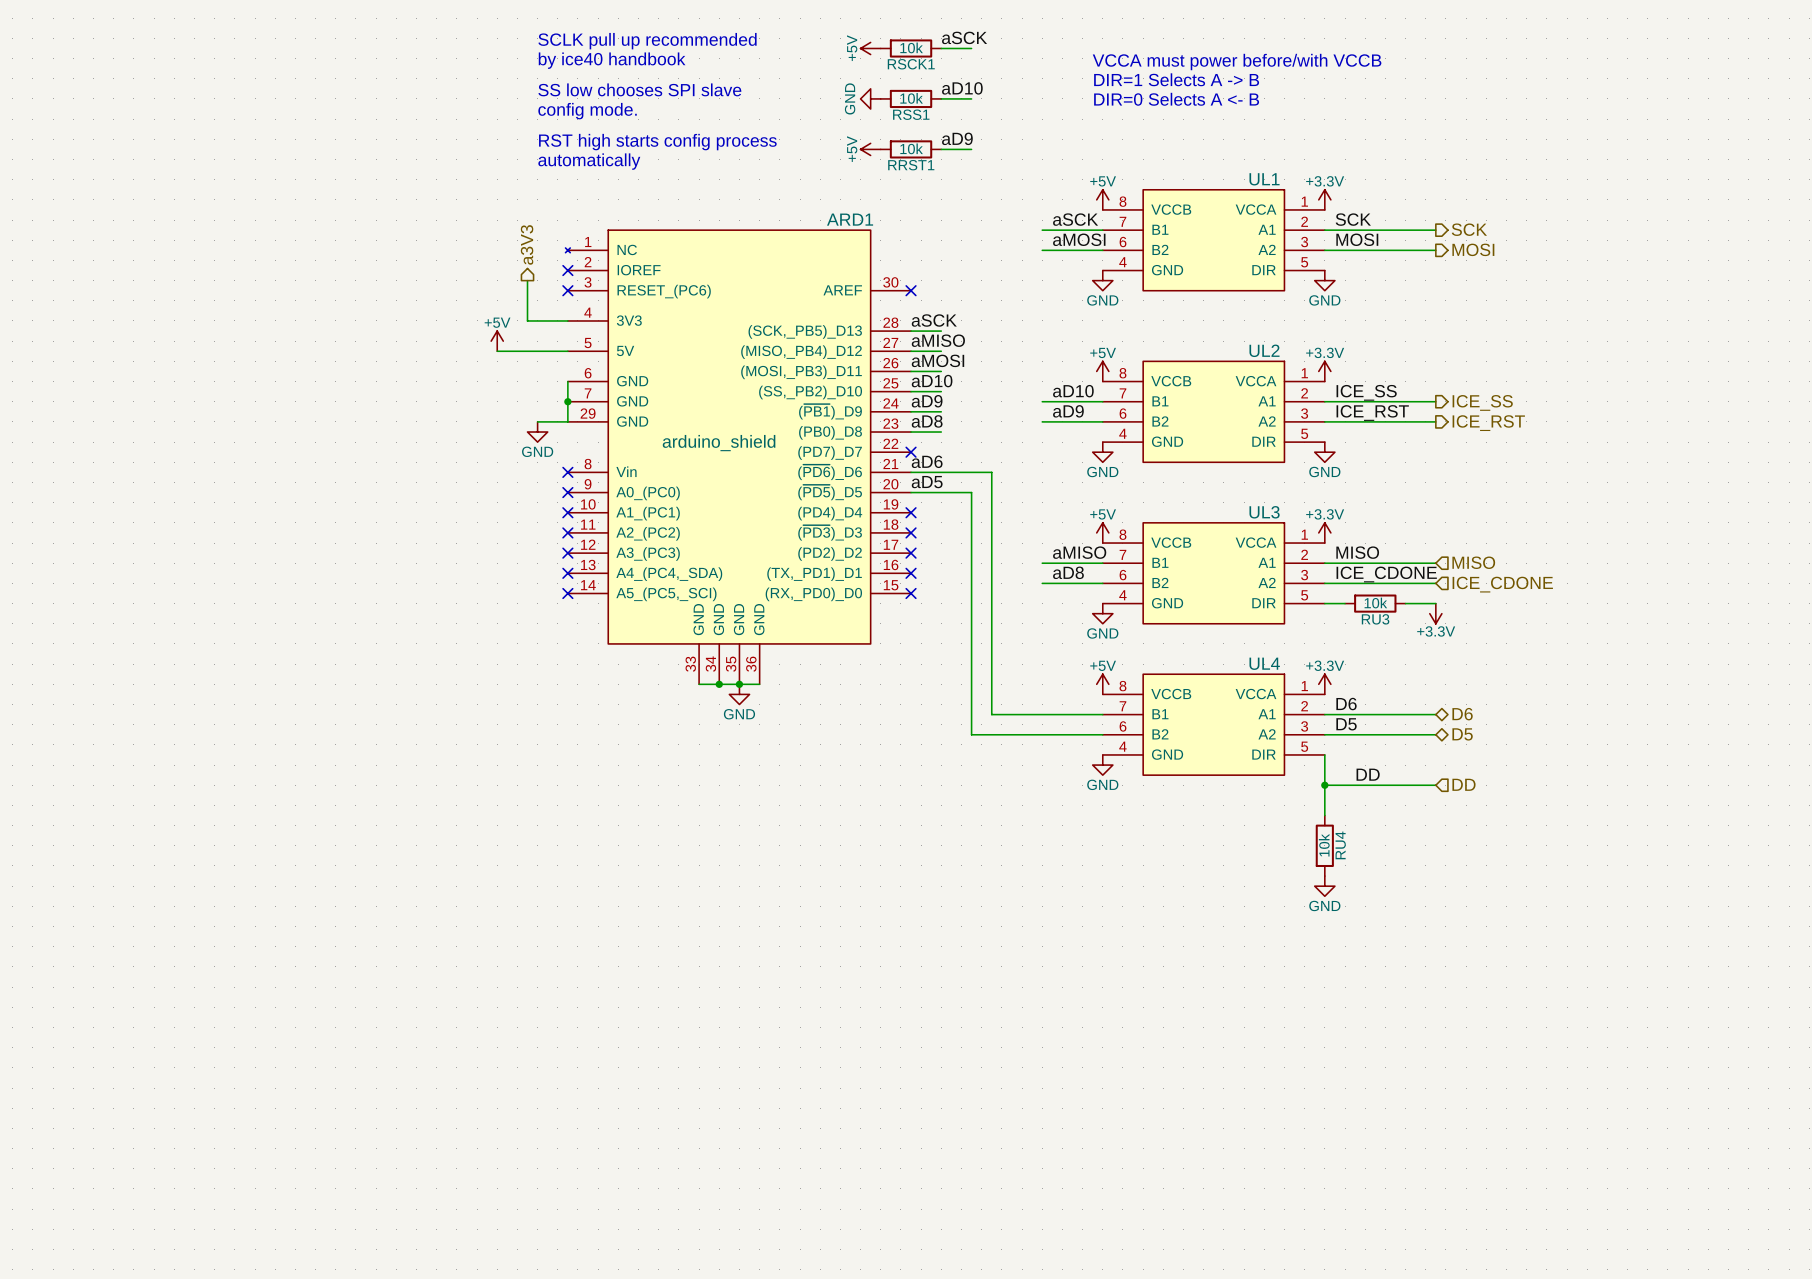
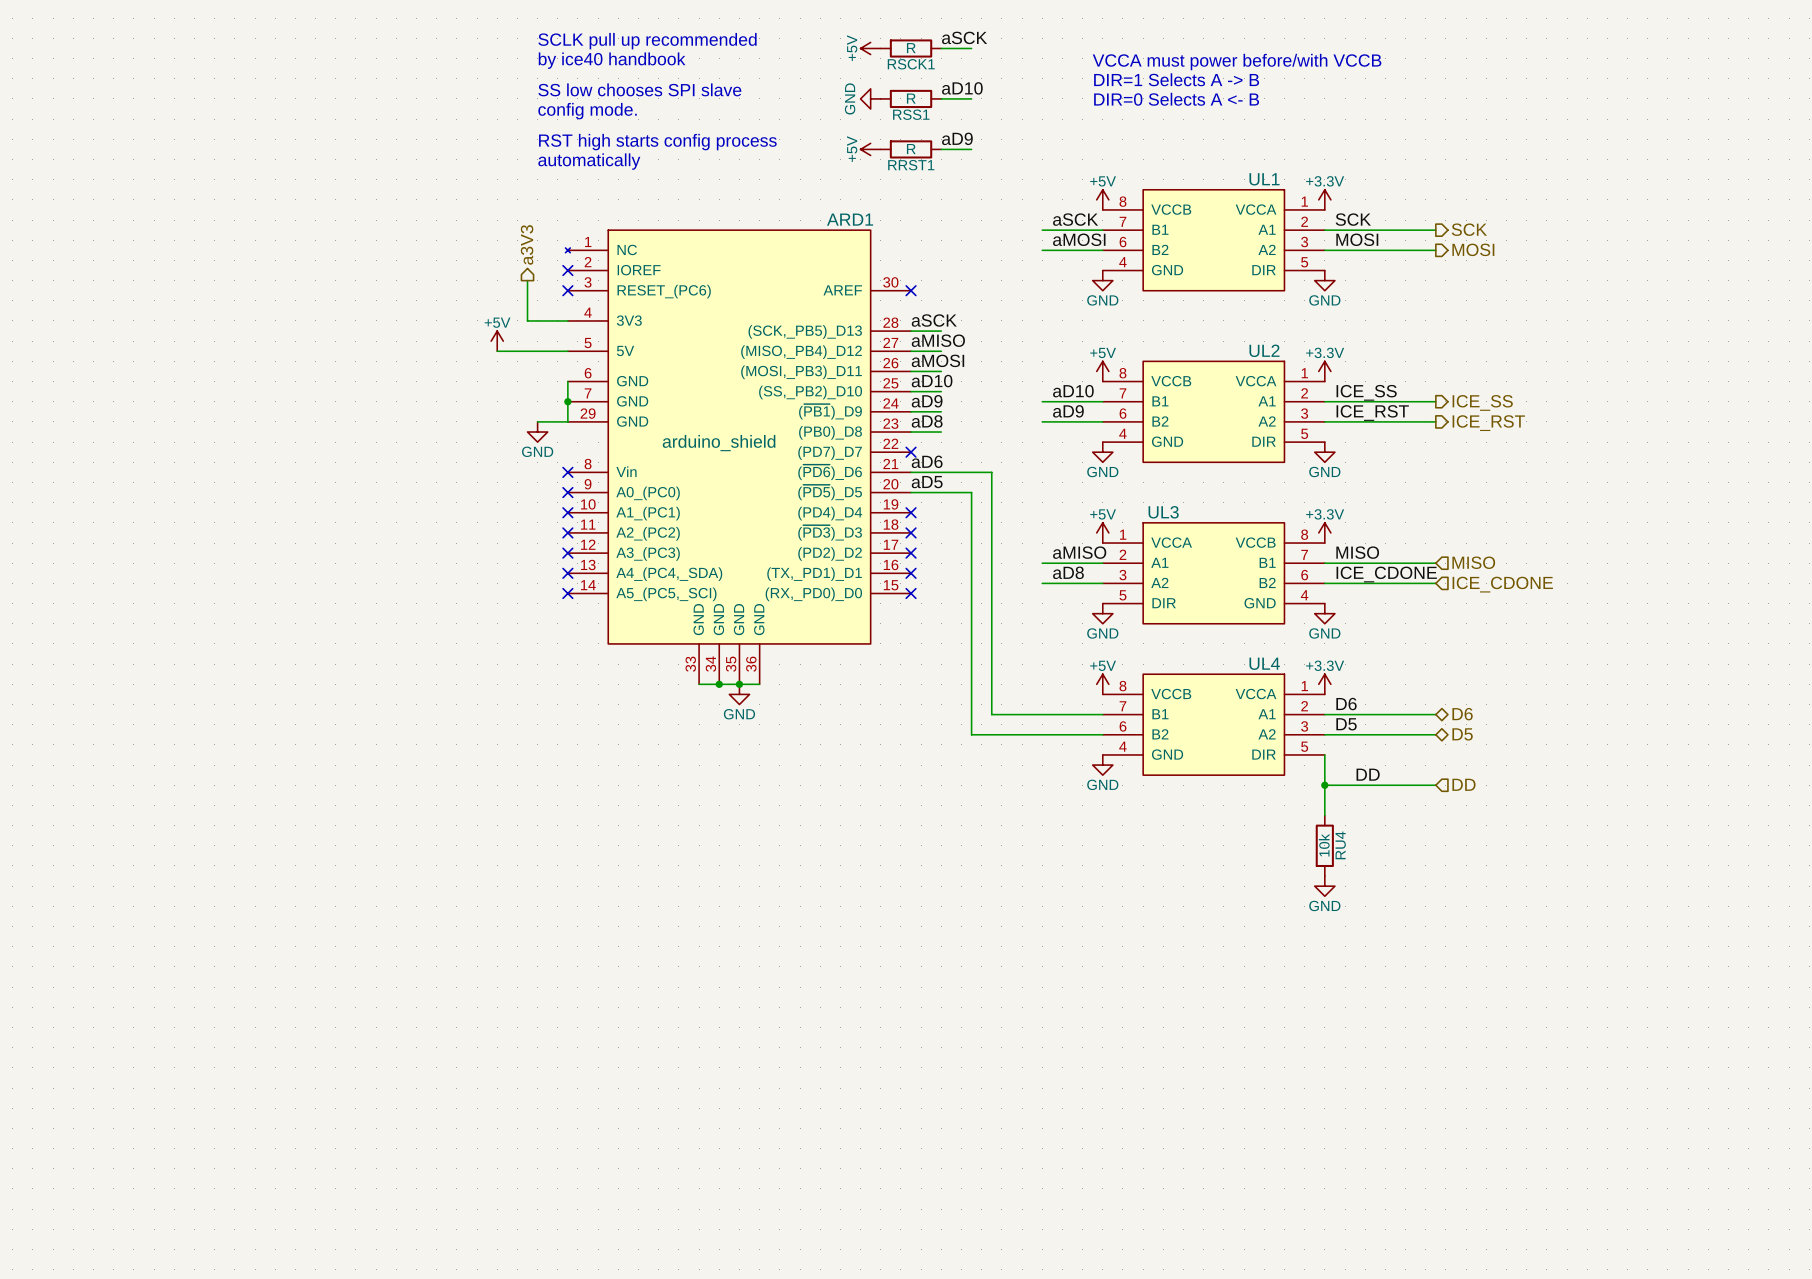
RSCK1 value: 10k (911, 47) -> R (911, 48)
RSS1 value: 10k (911, 98) -> R (911, 98)
RRST1 value: 10k (911, 148) -> R (911, 149)
UL3 flip: as is (1213, 573) -> left-right (1213, 573)
wire: (1324, 603) (1345, 603) -> none
RU3: 10k (1375, 603) -> none
wire: (1405, 603) (1435, 603) -> none
power symbol: none -> GND (1324, 613)
power symbol: +3.3V (1435, 613) -> none

